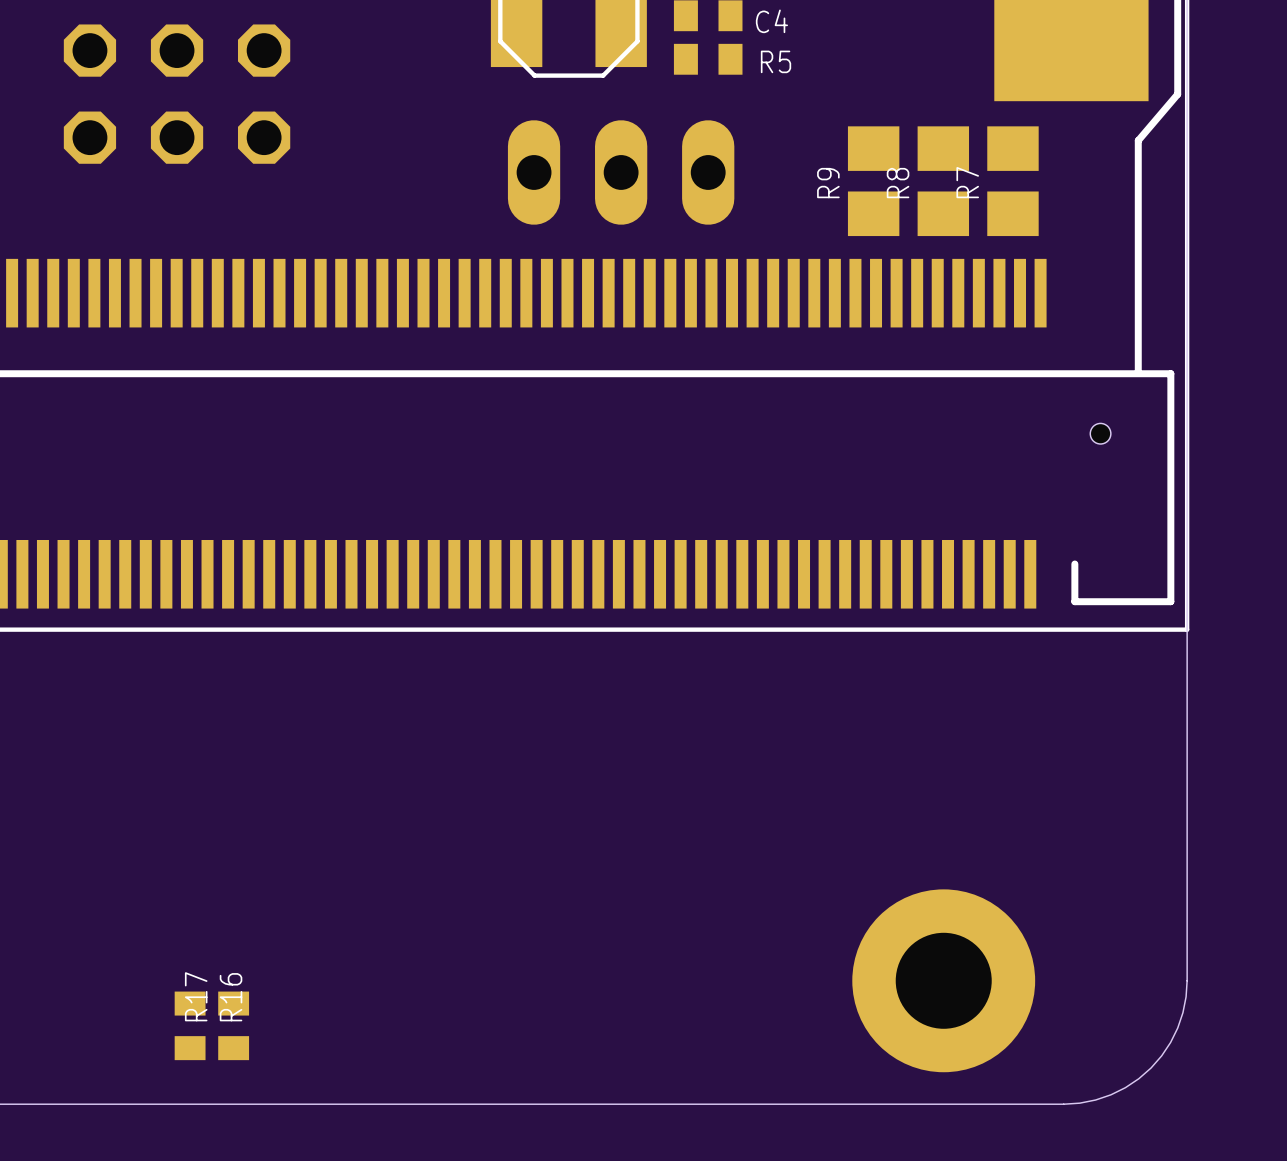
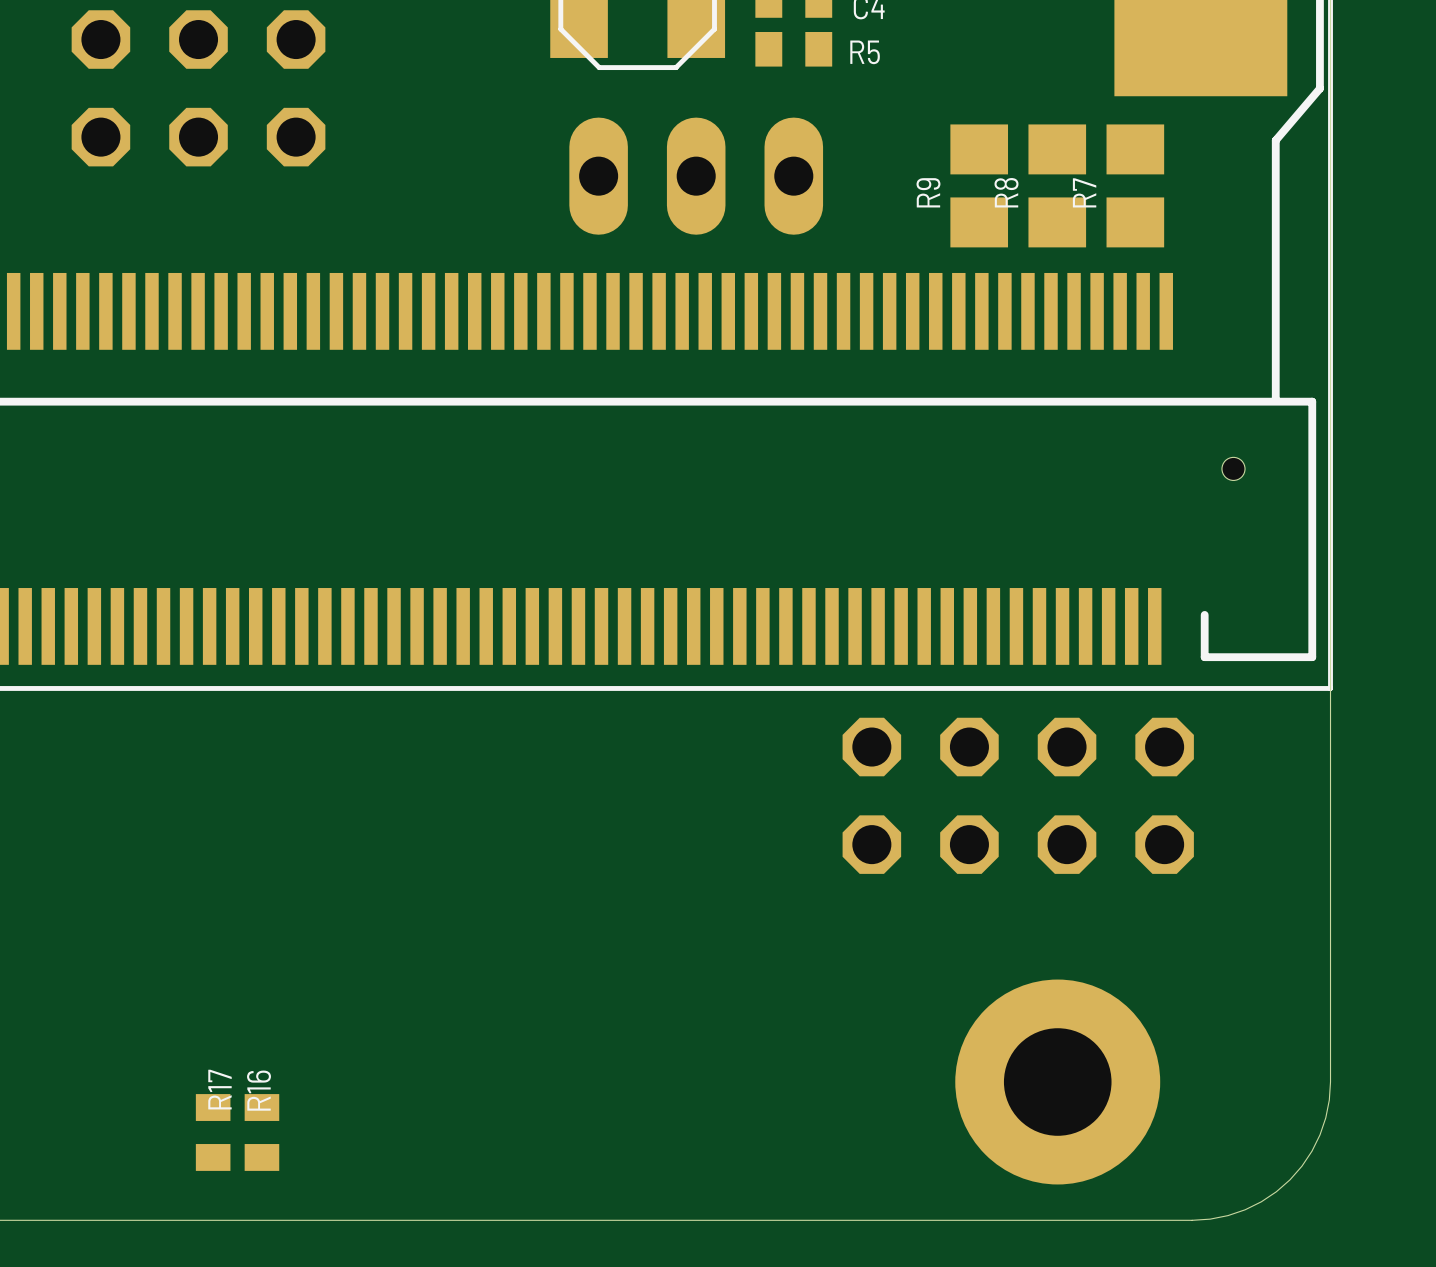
part: none -> (1018, 795)

